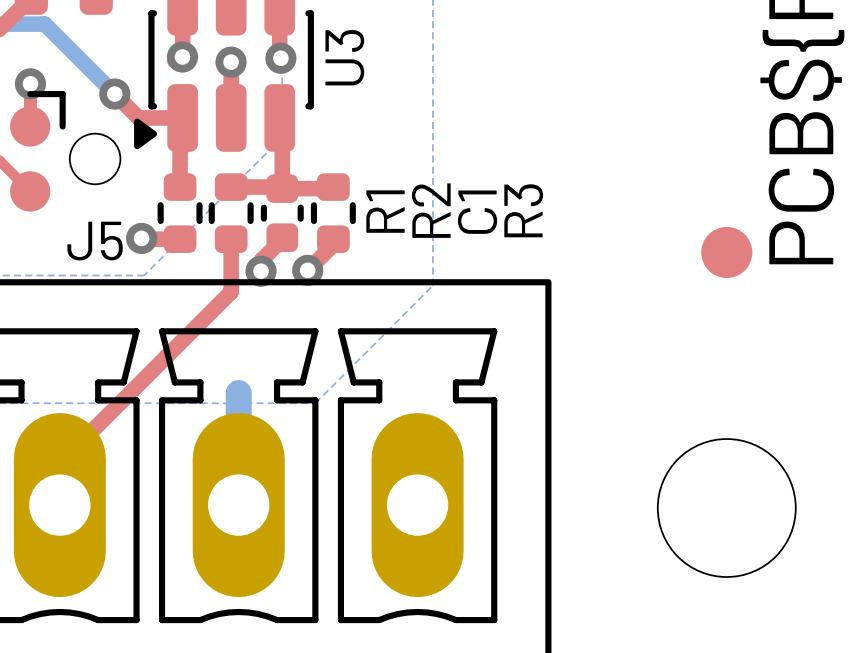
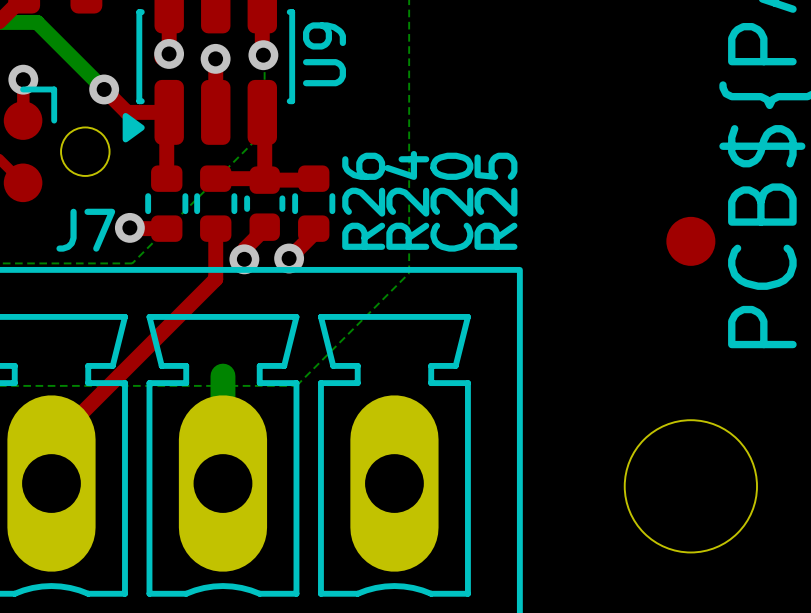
U3 name: U3 (344, 57) -> U9 (324, 54)
R2 name: R2 (431, 210) -> R24 (406, 200)
R3 name: R3 (523, 210) -> R25 (495, 201)
R1 name: R1 (385, 211) -> R26 (363, 201)
C1 name: C1 (477, 212) -> C20 (451, 202)
J5 name: J5 (95, 241) -> J7 (85, 230)

